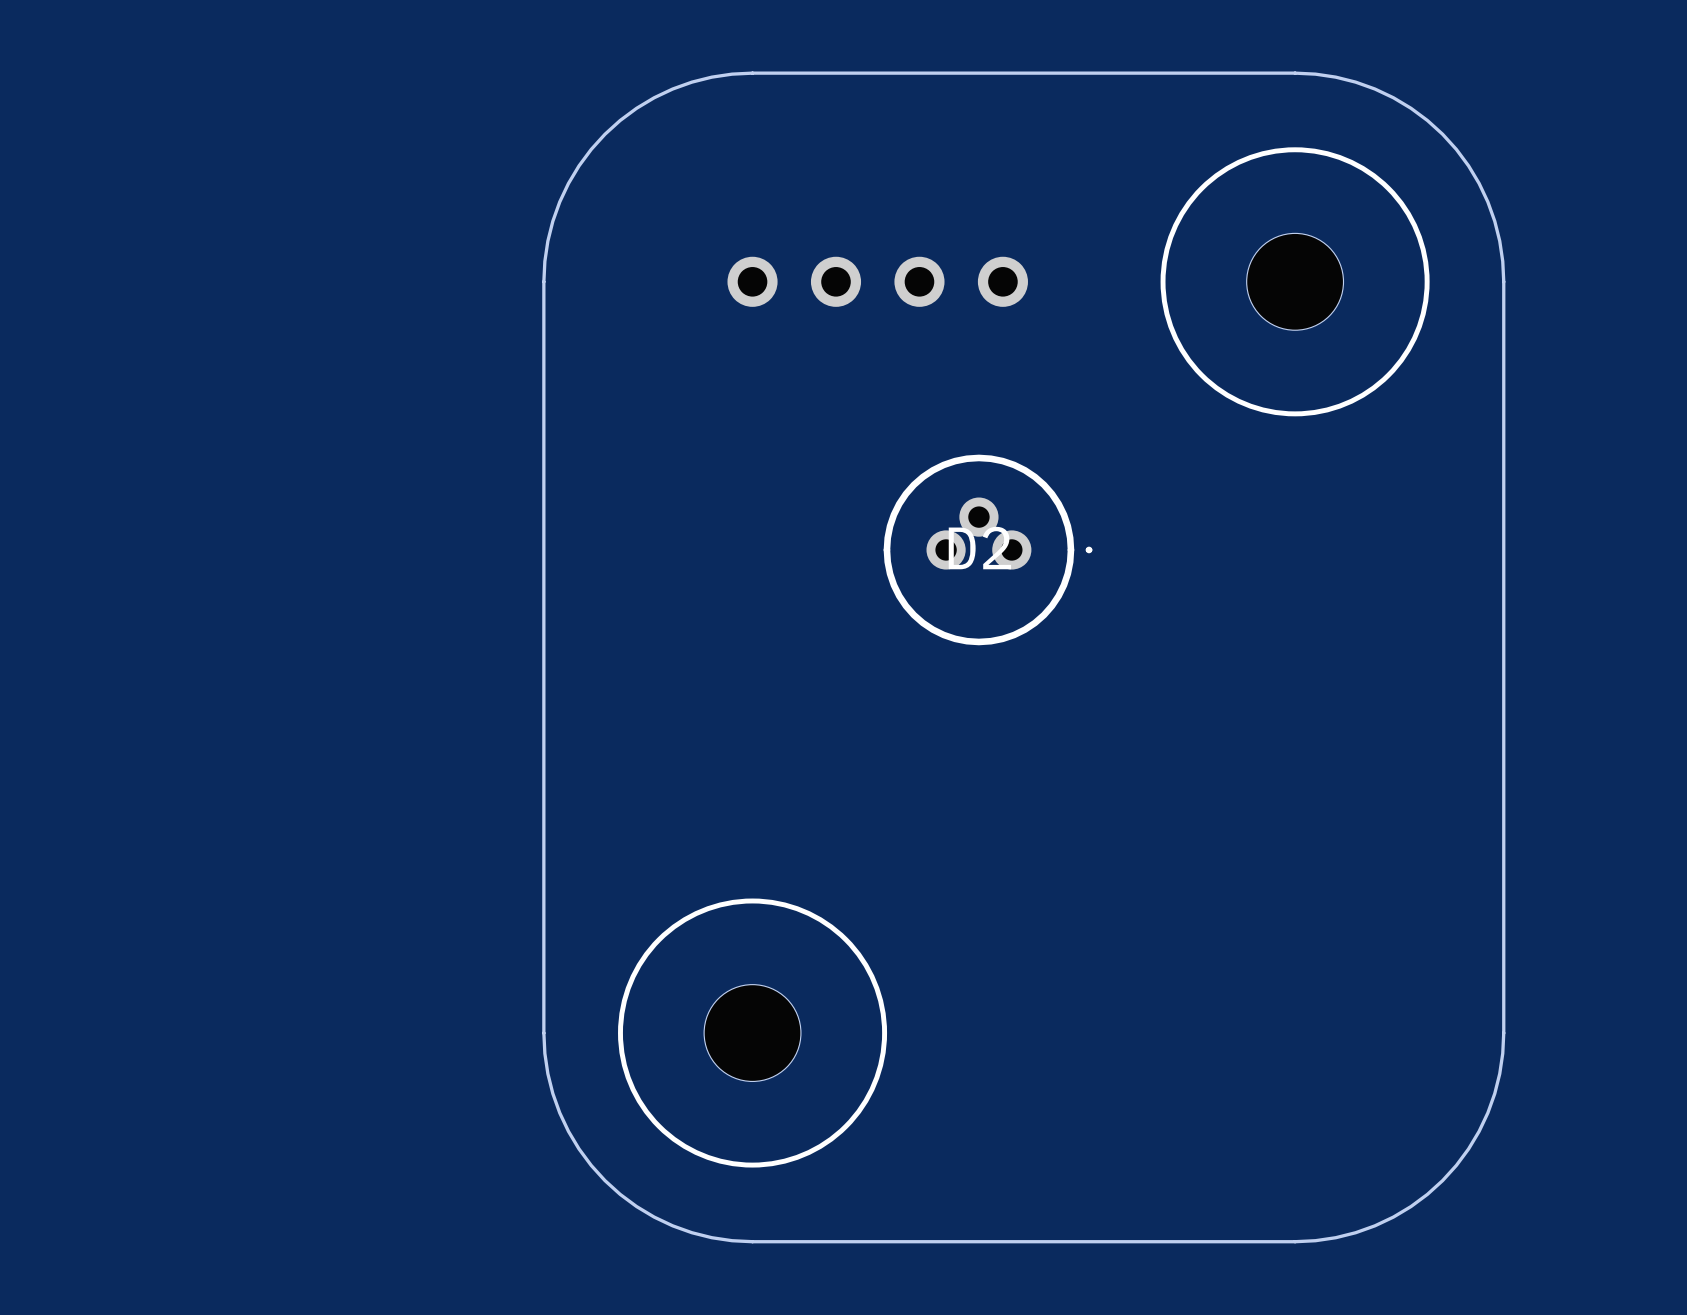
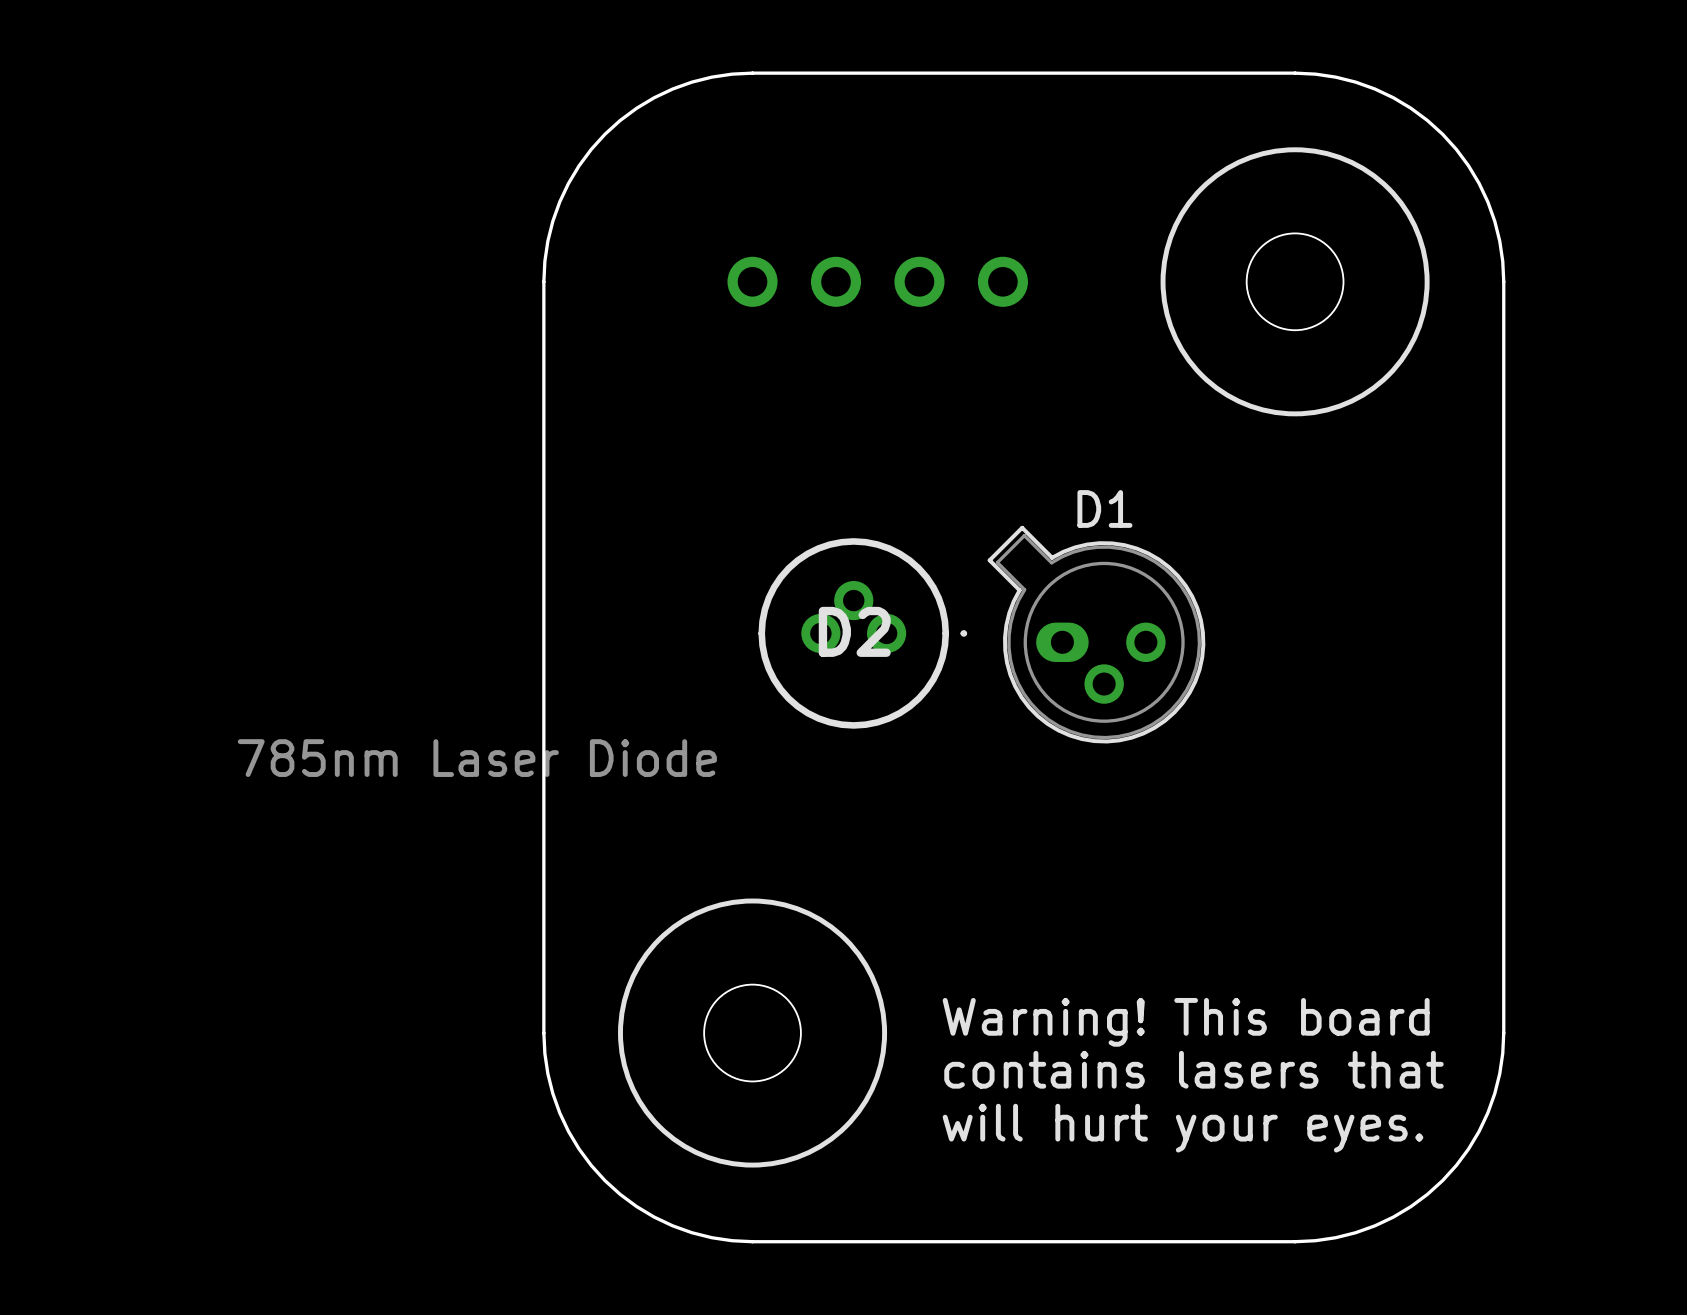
D2 position: (987, 549) -> (862, 633)
D1: none -> 785nm Laser Diode (1096, 634)
text: none -> Warning! This board (1186, 1022)
text: none -> contains lasers that (1193, 1069)
text: none -> will hurt your eyes. (1183, 1128)

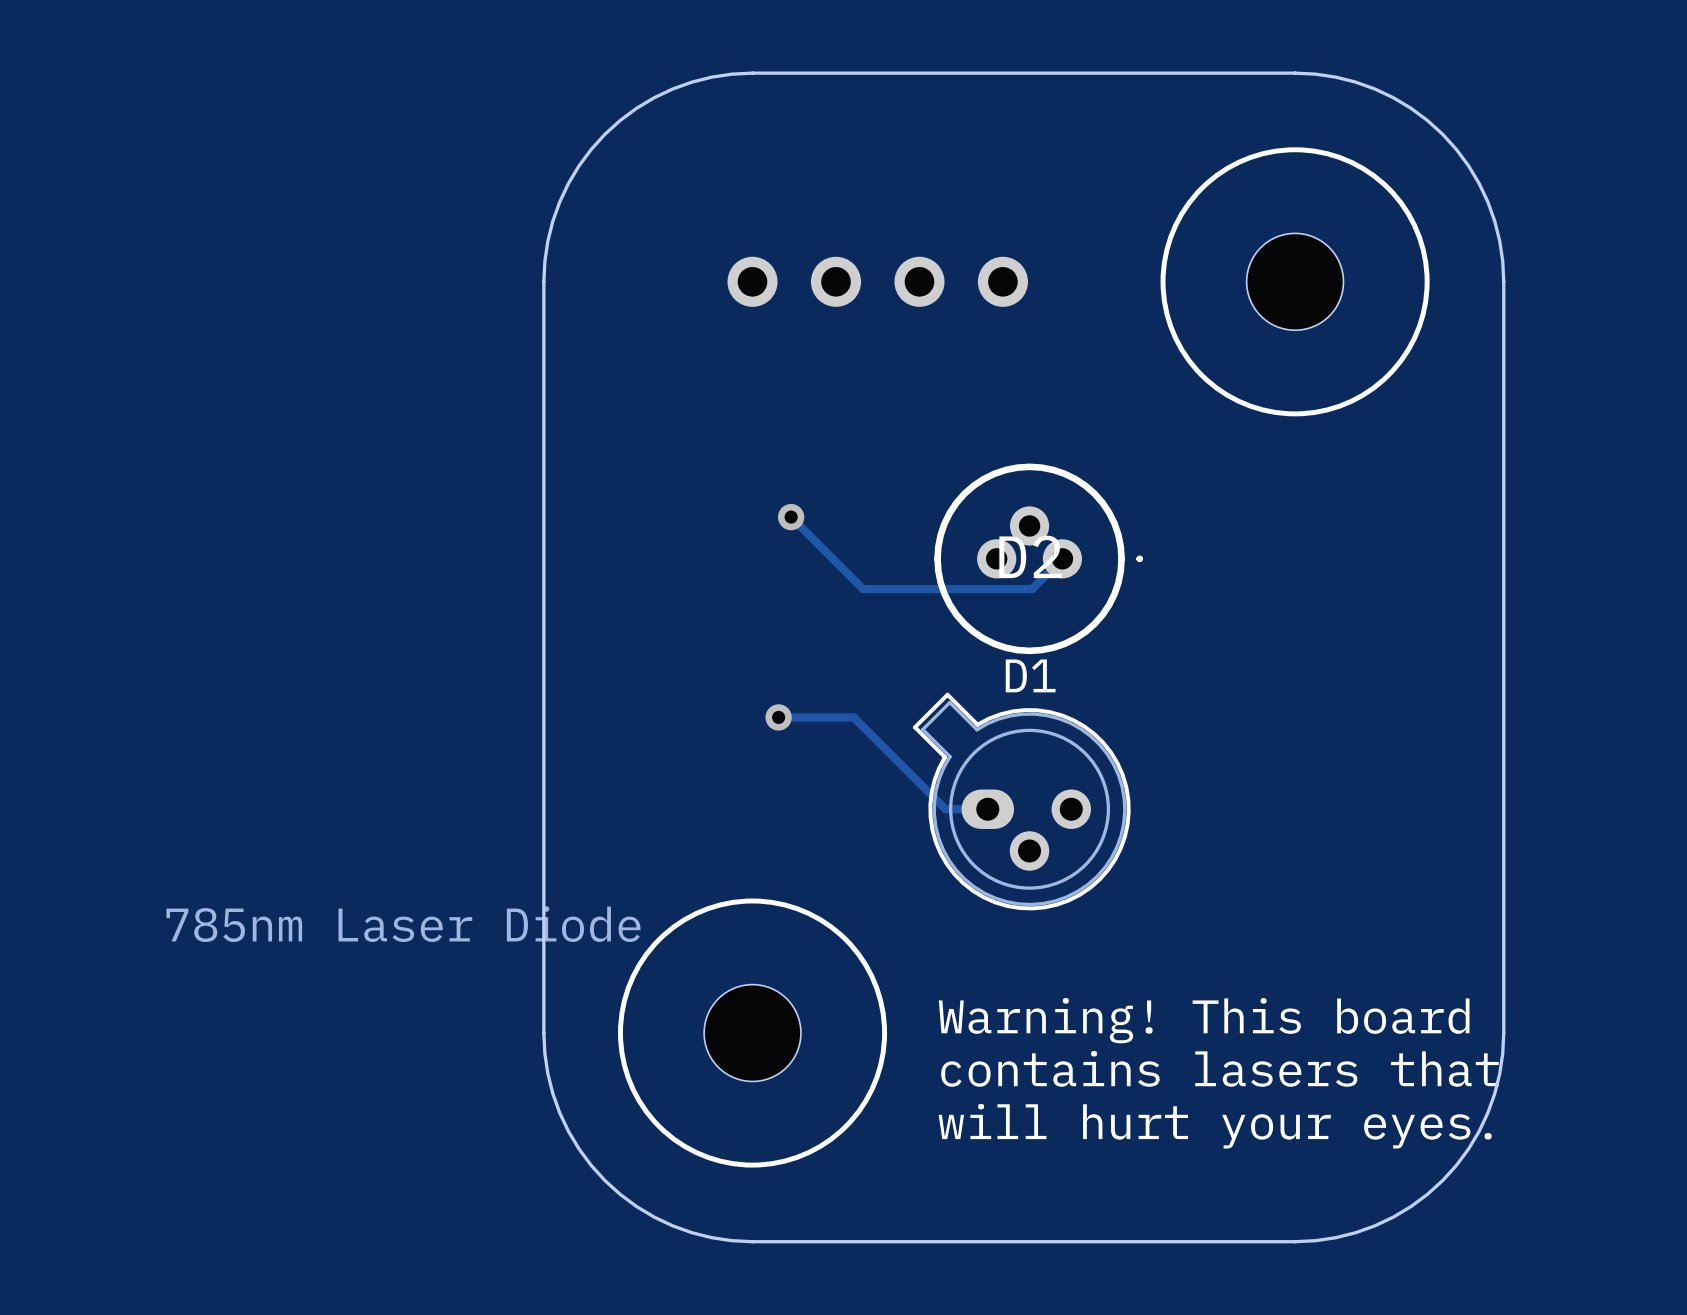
track: none -> (791, 517) (863, 589) (1032, 589) (1062, 558)
via: none -> (791, 517)
D2 position: (862, 633) -> (1038, 558)
D1 position: (1096, 634) -> (1021, 801)
track: none -> (778, 717) (853, 717) (945, 809) (987, 809)
via: none -> (778, 717)

